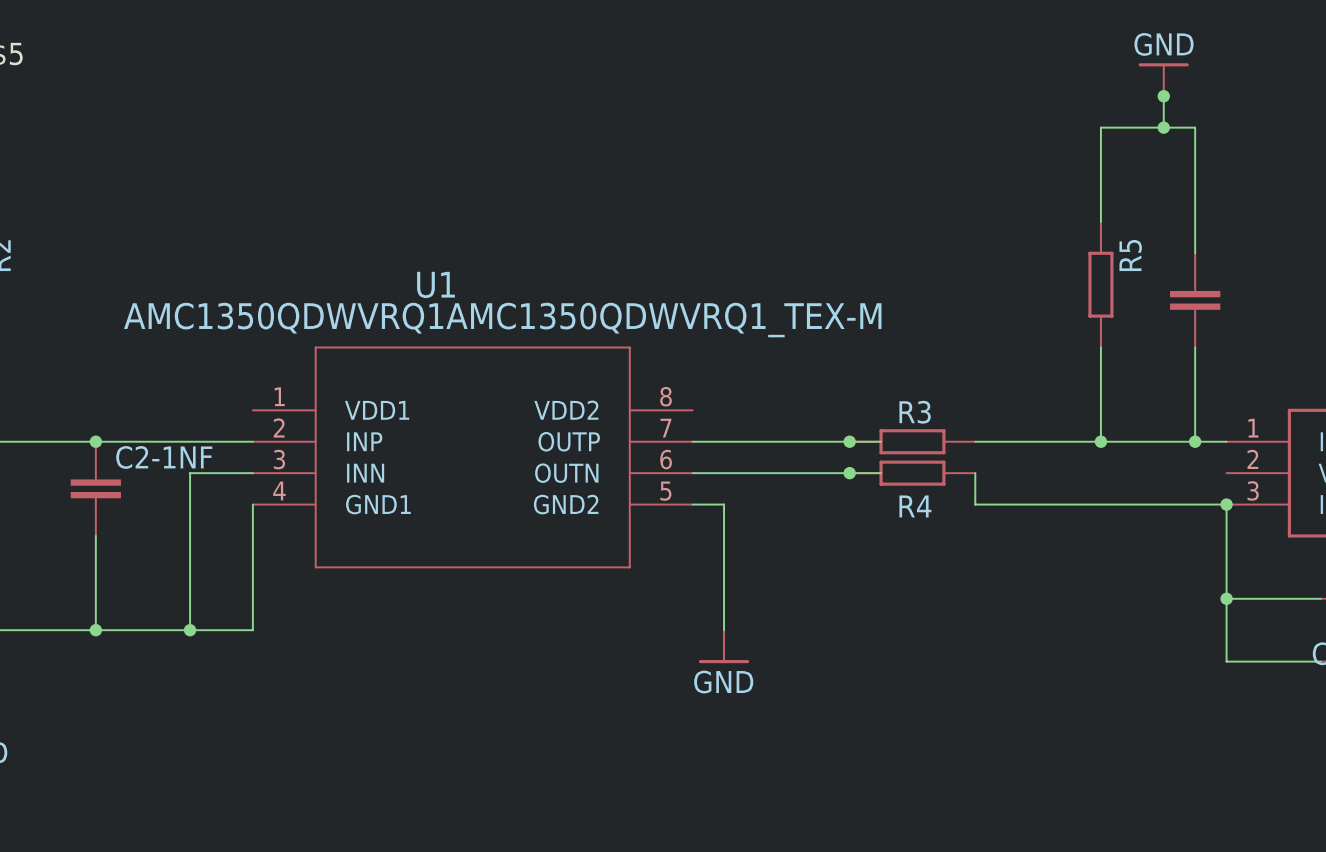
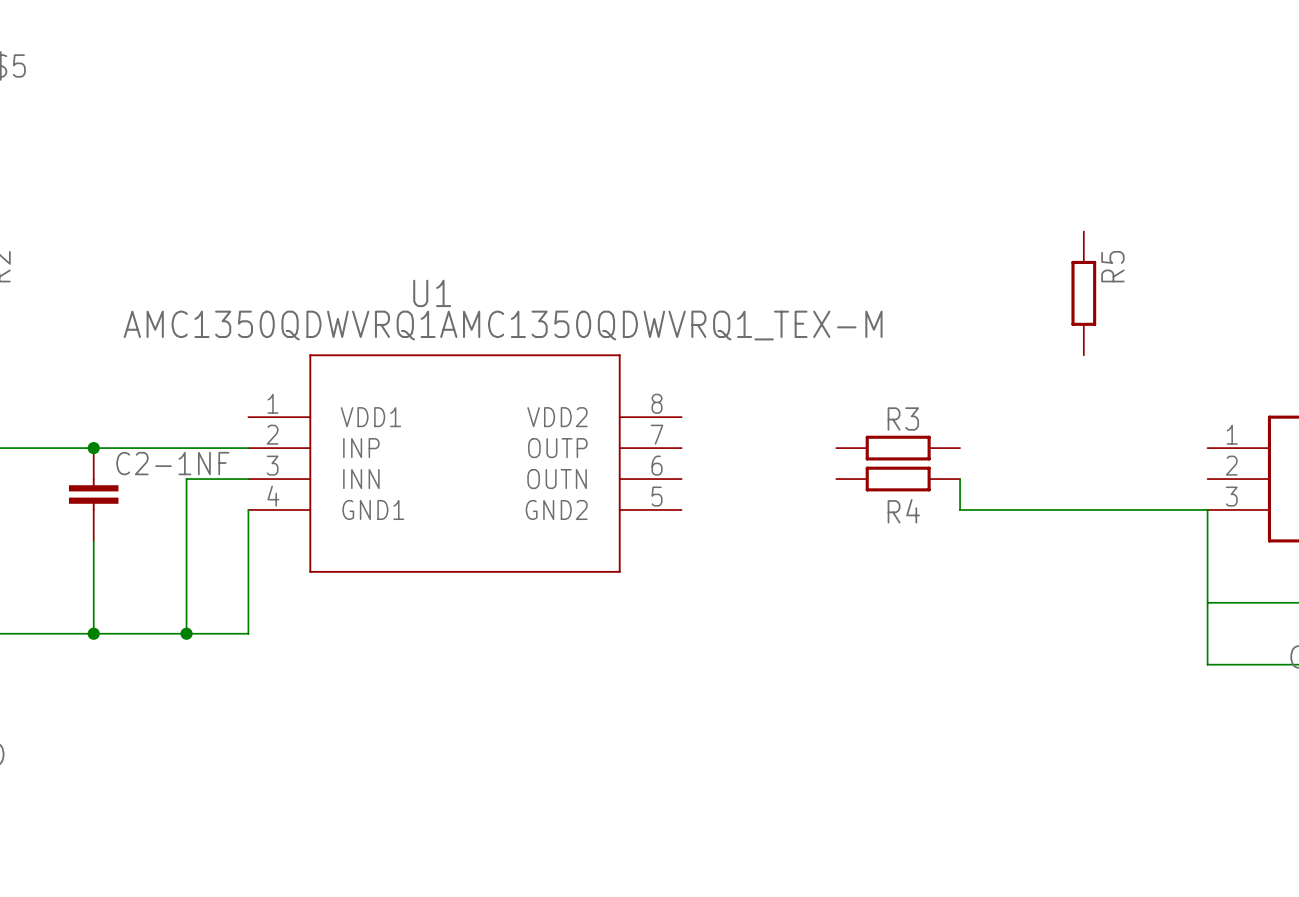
power symbol: GND (1163, 79) -> none
wire: (1163, 96) (1163, 127) -> none
junction: (1163, 96) -> none
junction: (1163, 127) -> none
wire: (1100, 221) (1100, 127) (1195, 127) (1195, 253) -> none
part: (1195, 300) -> none
wire: (1100, 347) (1100, 441) -> none
wire: (1195, 347) (1195, 441) -> none
wire: (692, 441) (881, 441) -> none
junction: (849, 441) -> none
wire: (975, 441) (1226, 441) -> none
junction: (1100, 441) -> none
junction: (1195, 441) -> none
wire: (692, 473) (881, 473) -> none
junction: (849, 473) -> none
wire: (692, 504) (724, 504) (724, 630) -> none
junction: (1226, 504) -> none
junction: (1226, 598) -> none
power symbol: GND (724, 646) -> none

